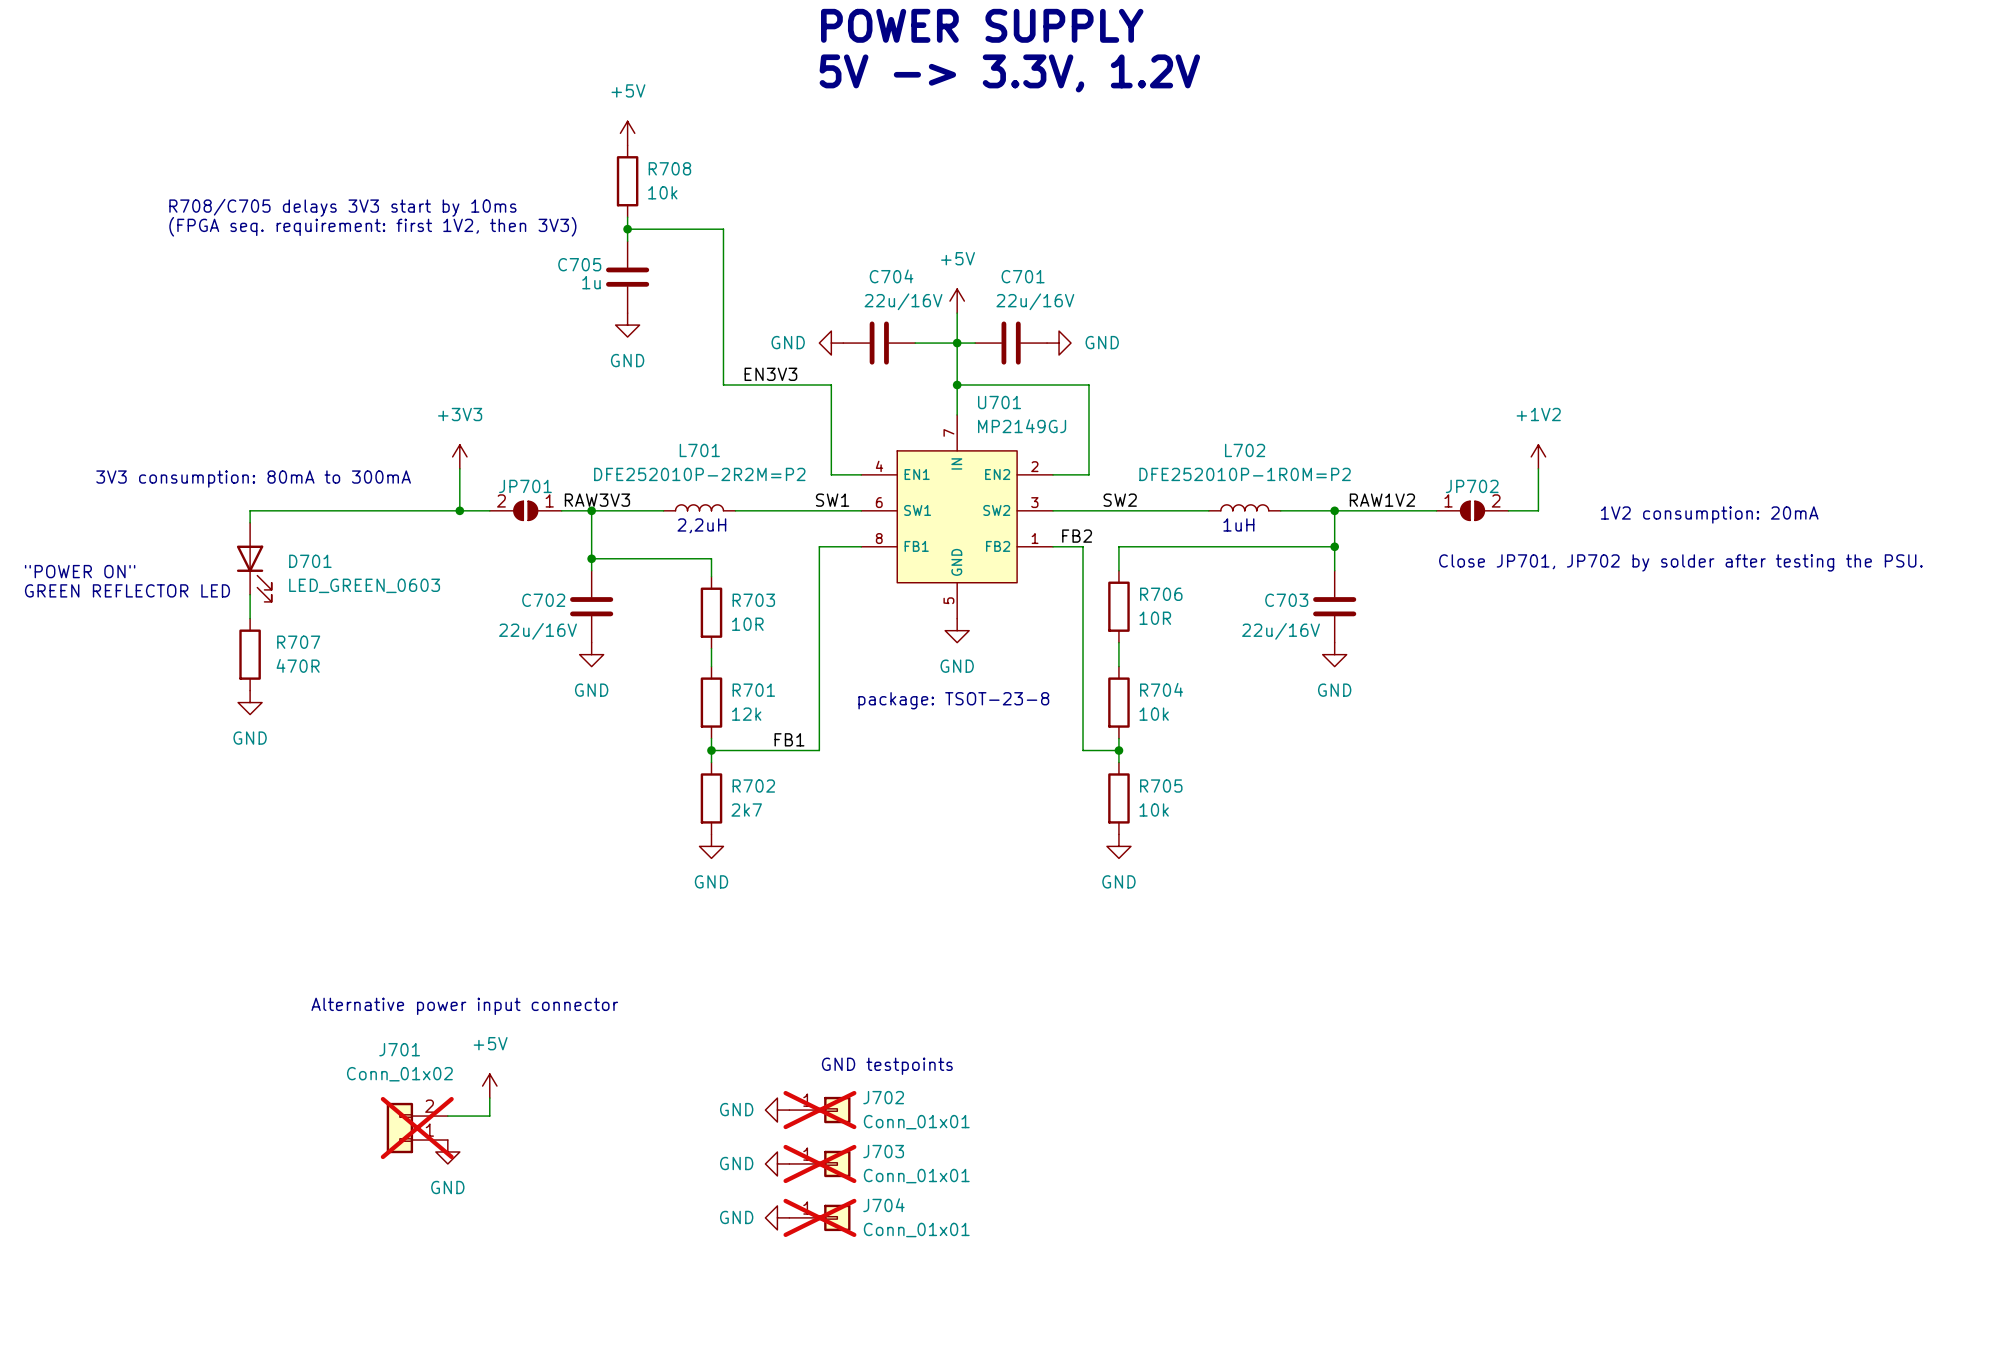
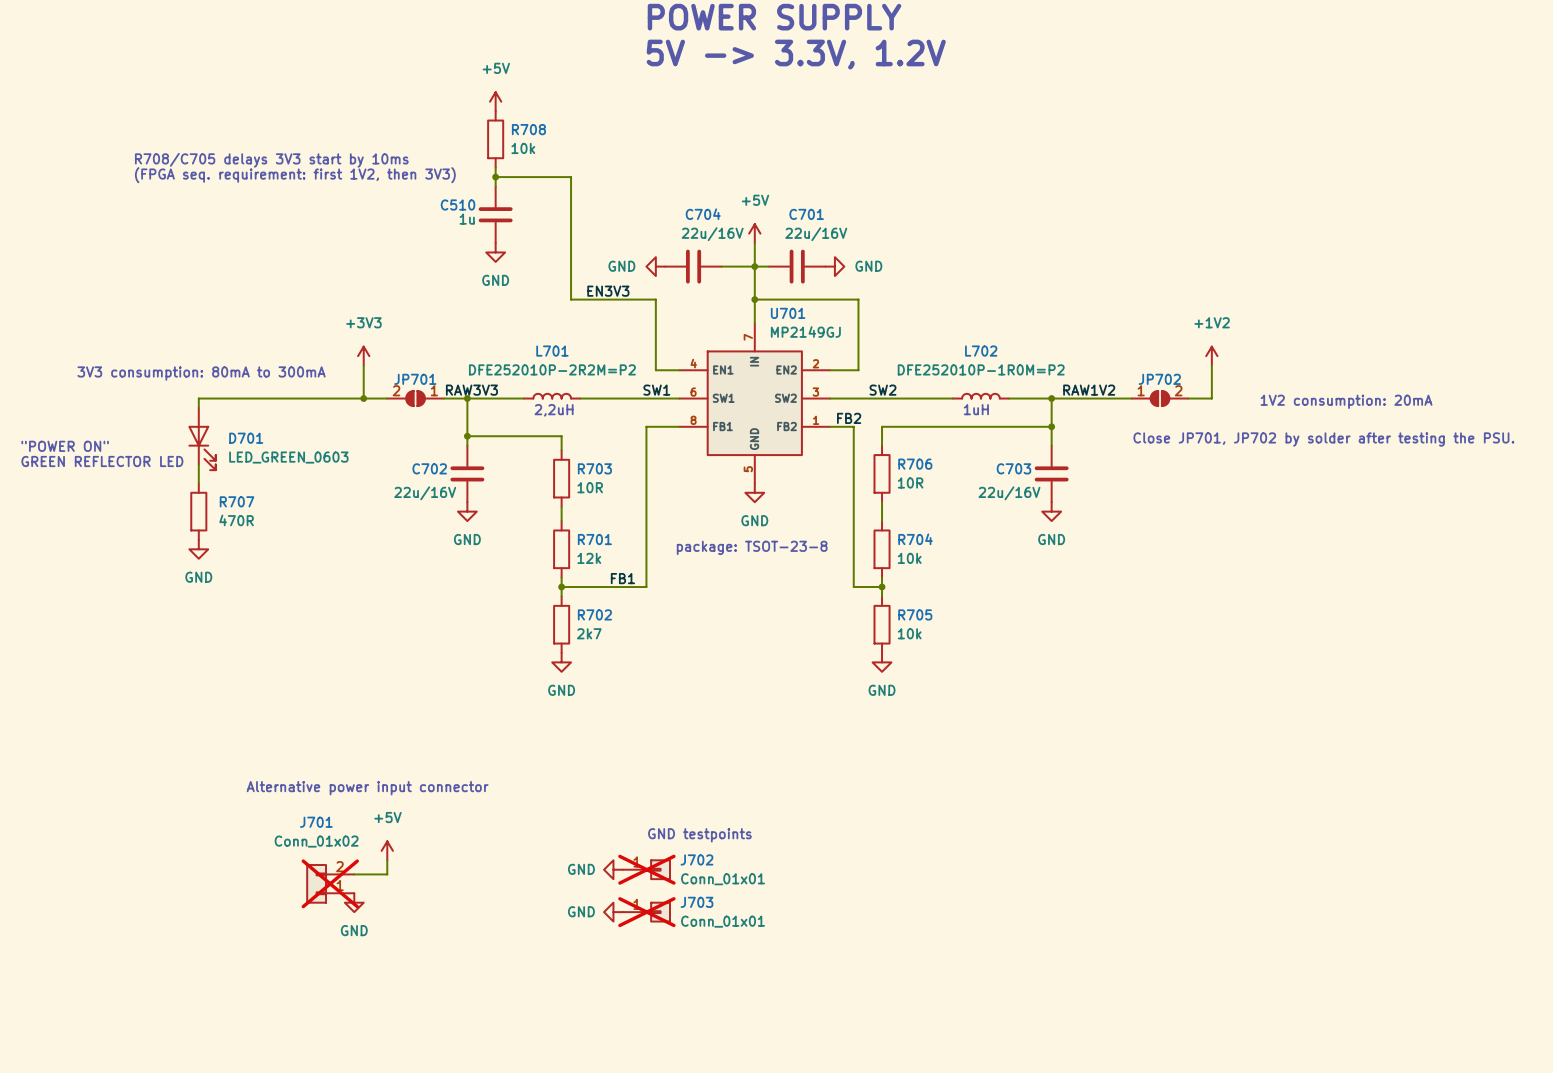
C705 name: C705 (579, 264) -> C510 (458, 204)
power symbol: GND (777, 1217) -> none
J704: Conn_01x01 (819, 1217) -> none

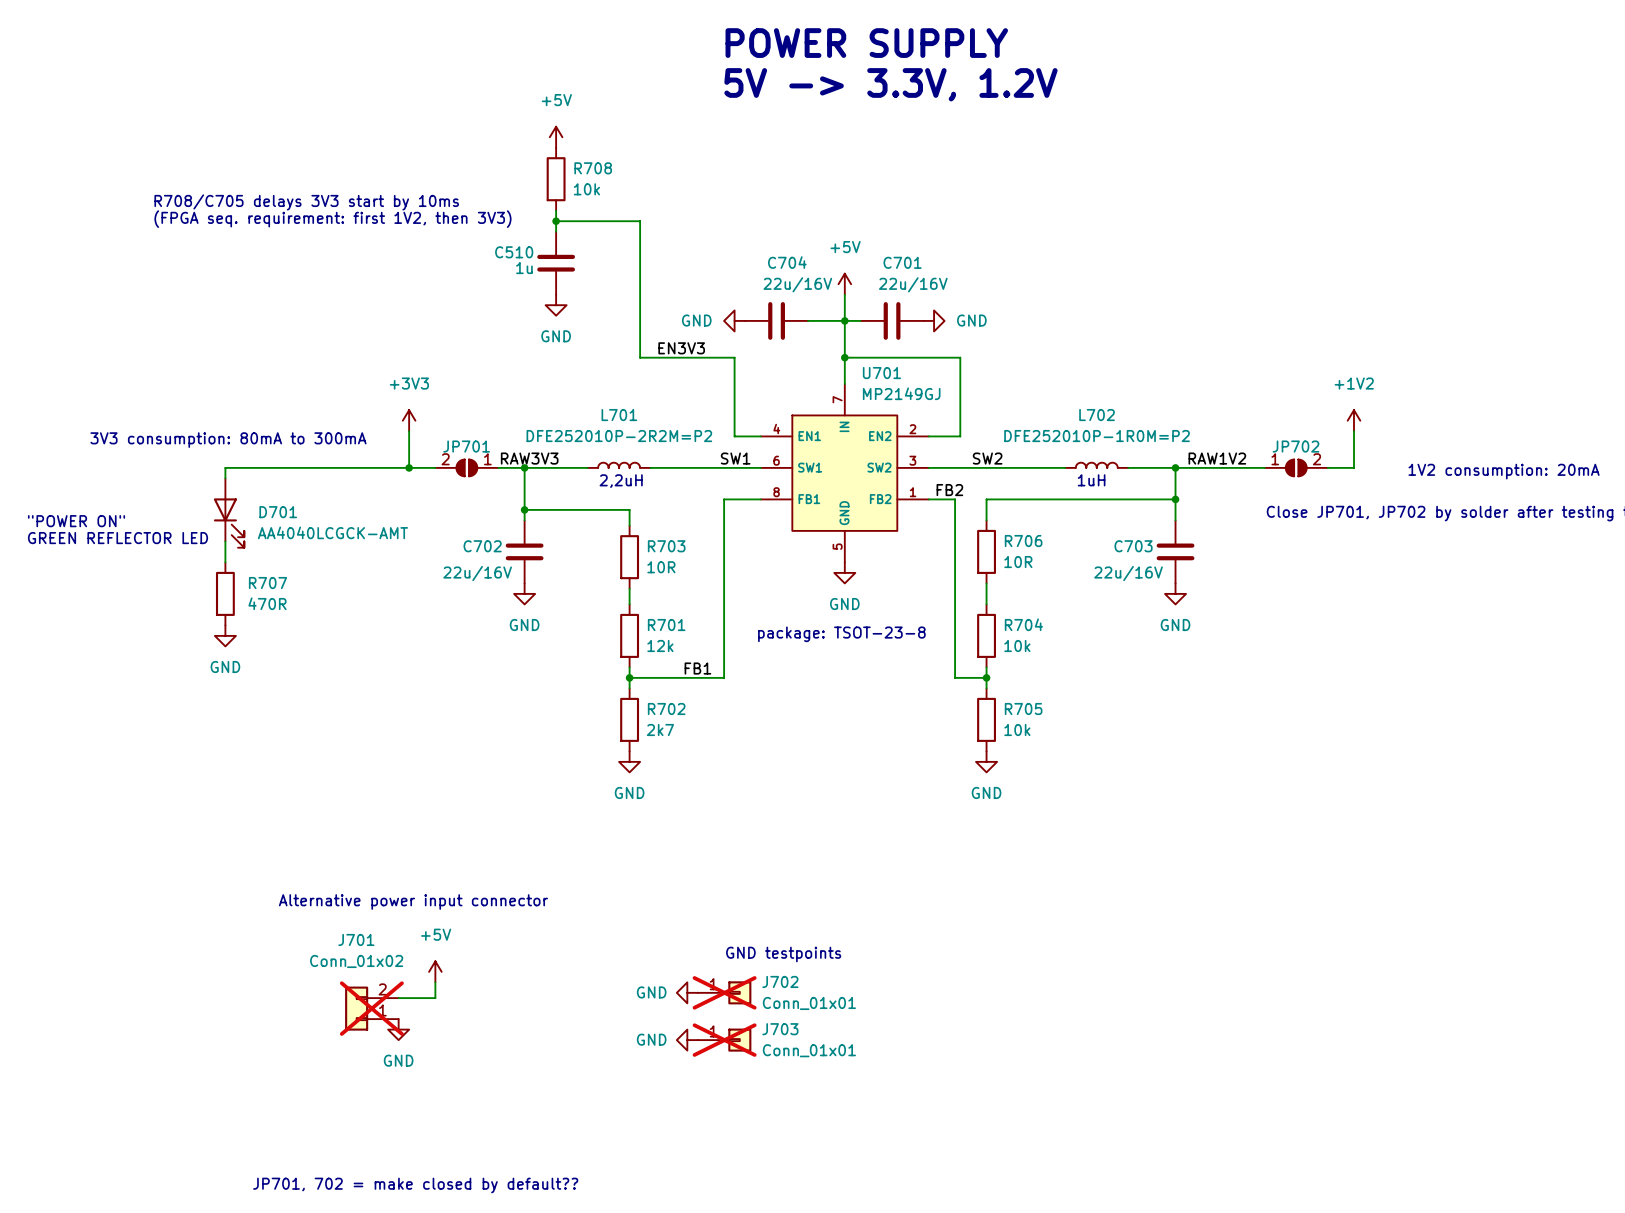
D701 value: LED_GREEN_0603 (288, 457) -> AA4040LCGCK-AMT (332, 532)
text: none -> JP701, 702 = make closed by default?? (415, 1185)

